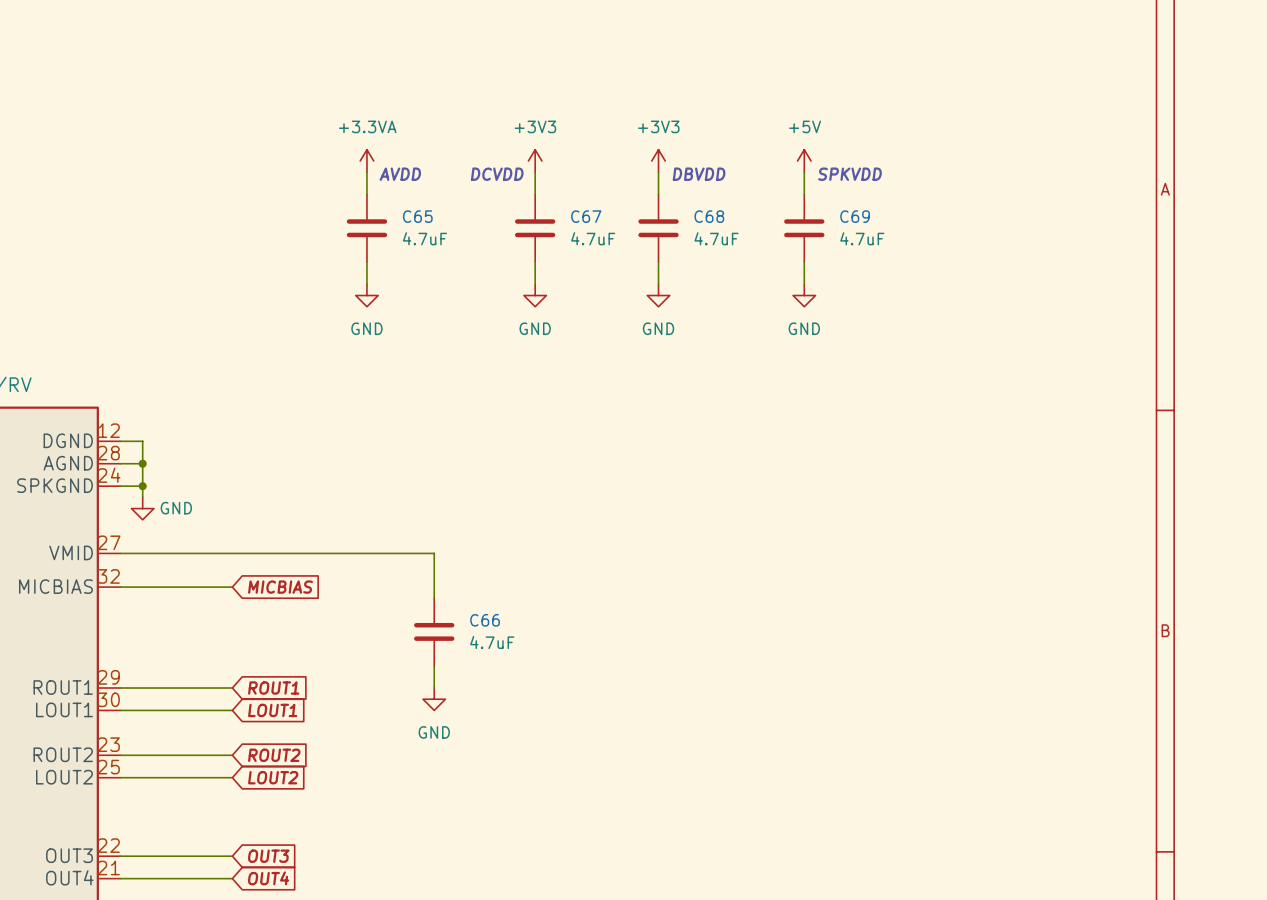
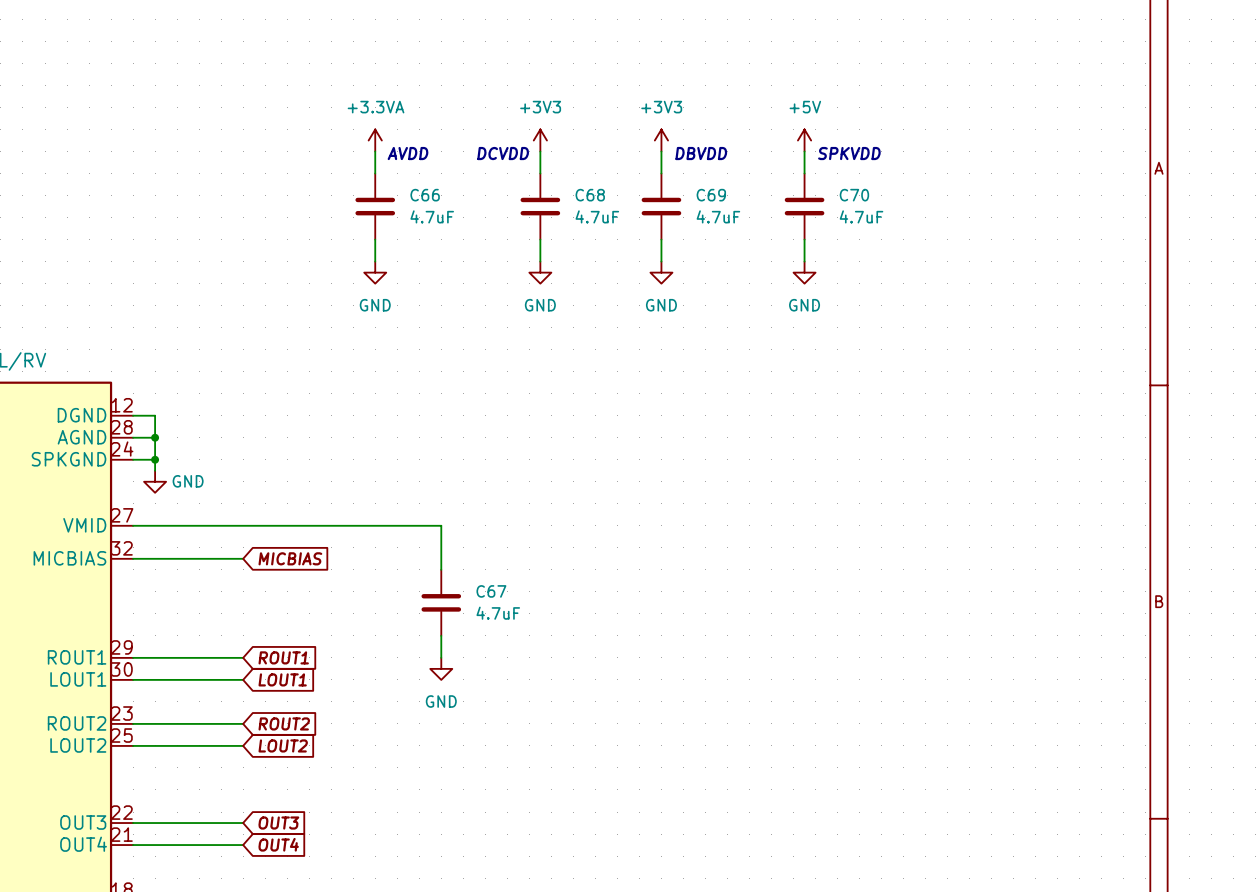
C65 name: C65 (417, 216) -> C66 (425, 195)
C67 name: C67 (586, 216) -> C68 (590, 195)
C68 name: C68 (709, 216) -> C69 (711, 195)
C69 name: C69 (855, 216) -> C70 (854, 195)
C66 name: C66 (485, 620) -> C67 (491, 591)

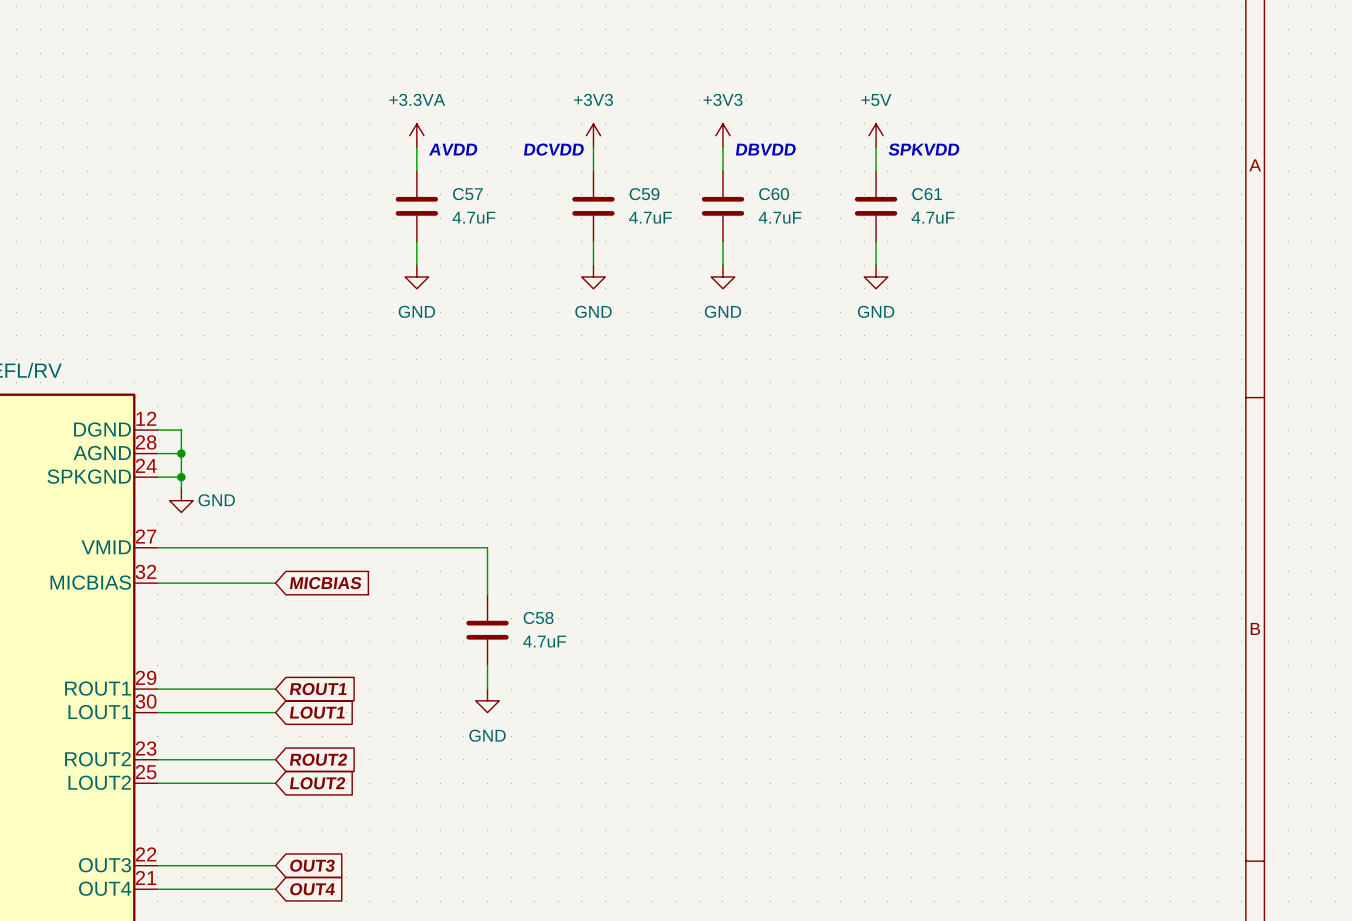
C66 name: C66 (425, 195) -> C57 (467, 194)
C68 name: C68 (590, 195) -> C59 (644, 194)
C69 name: C69 (711, 195) -> C60 (774, 194)
C70 name: C70 (854, 195) -> C61 (927, 194)
C67 name: C67 (491, 591) -> C58 (538, 617)

